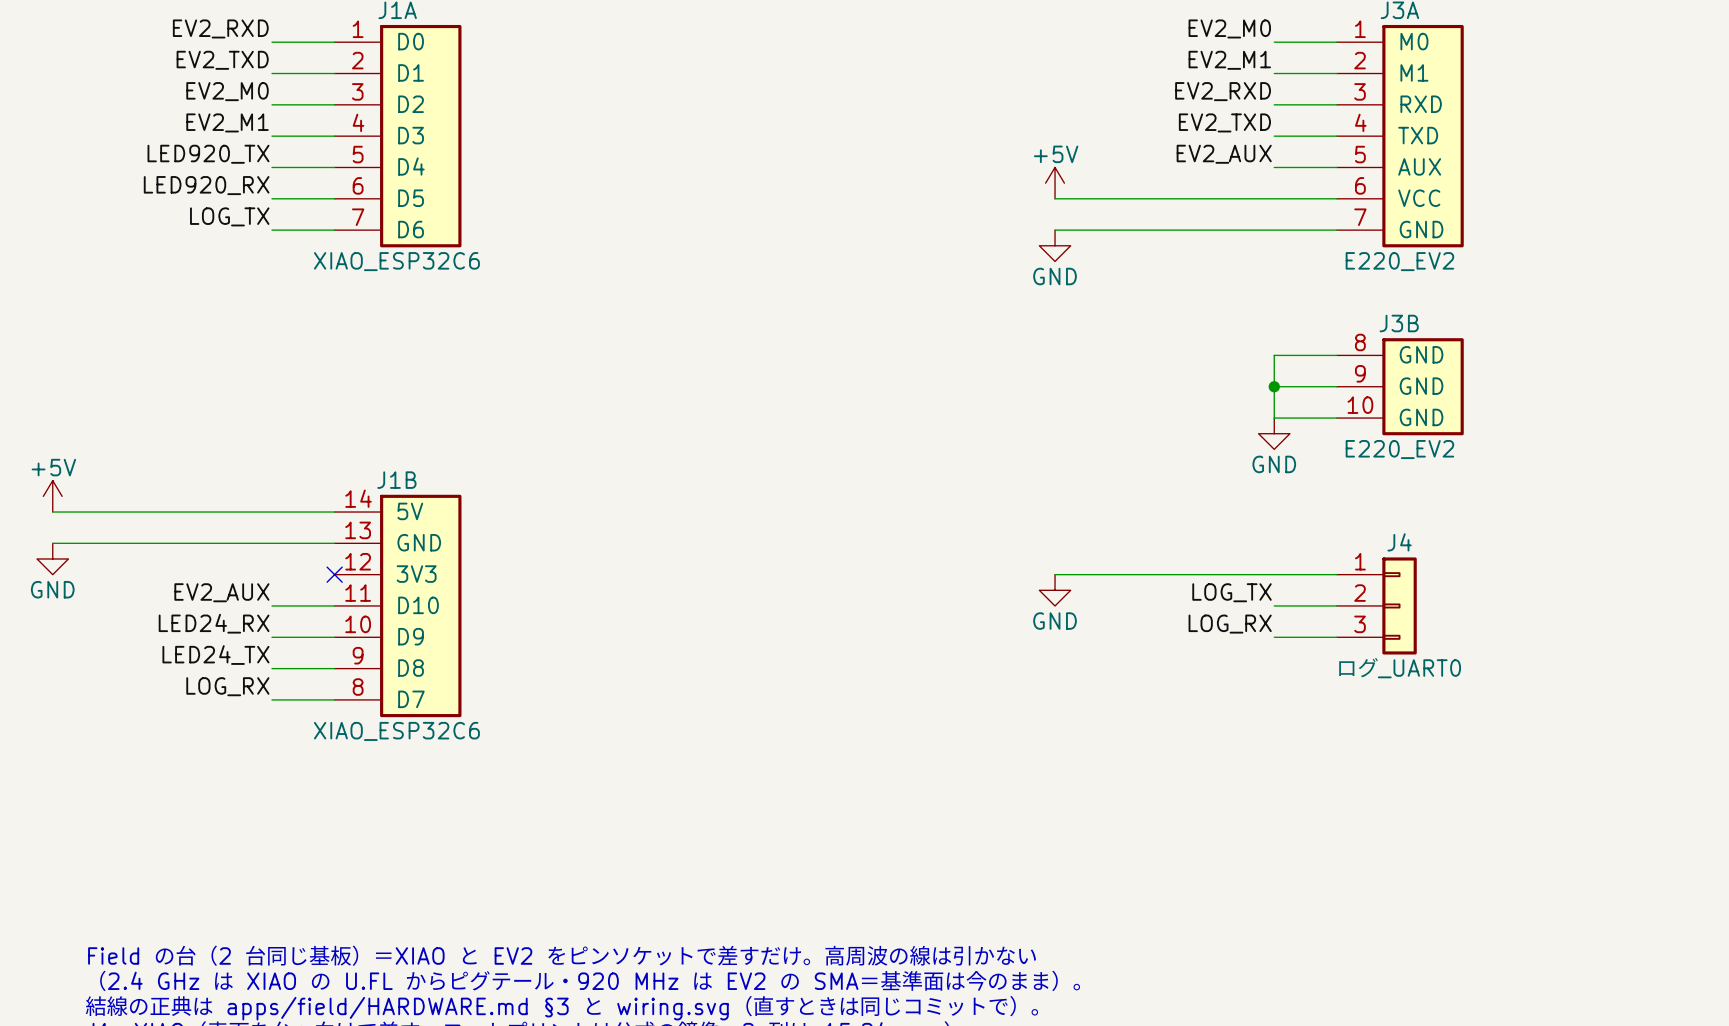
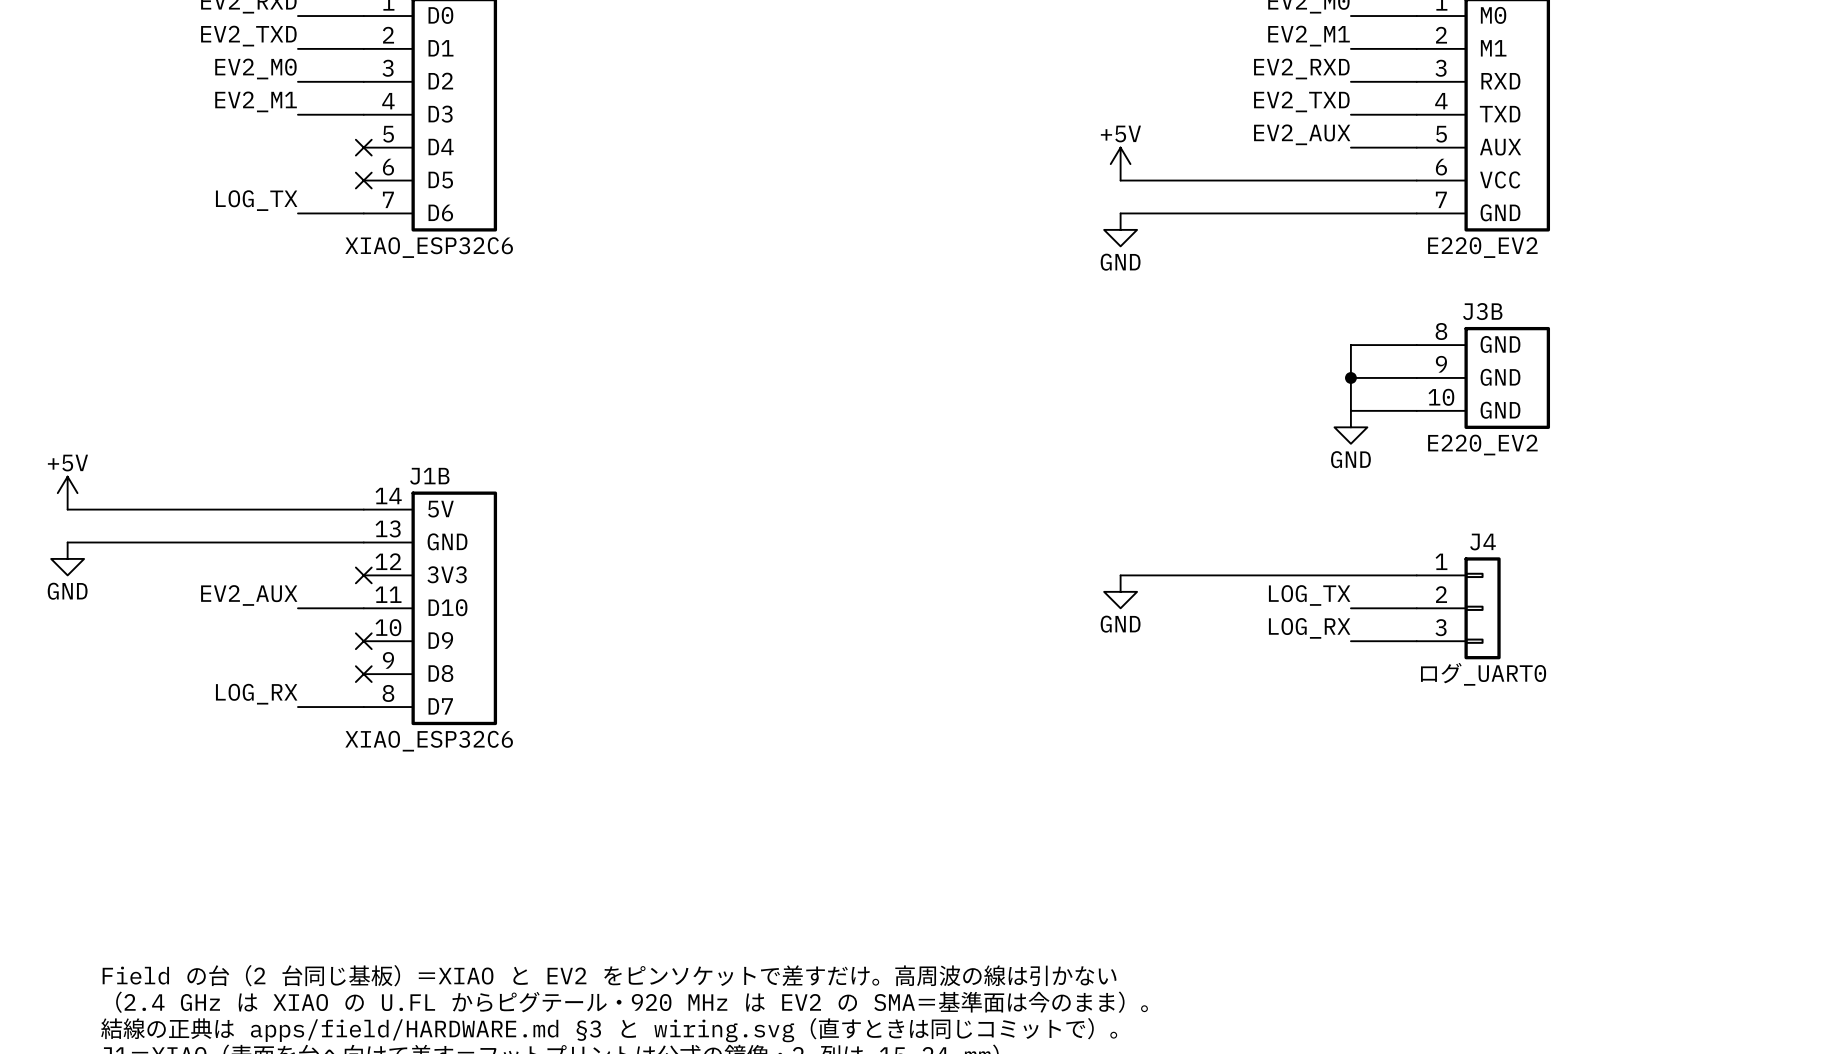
label: LED920_TX (208, 154) -> none
wire: (271, 167) (334, 167) -> none
no-connect mark: none -> (363, 147)
label: LED920_RX (206, 185) -> none
wire: (271, 198) (334, 198) -> none
no-connect mark: none -> (363, 180)
label: LED24_RX (214, 623) -> none
wire: (271, 637) (334, 637) -> none
no-connect mark: none -> (363, 641)
label: LED24_TX (215, 655) -> none
wire: (271, 668) (334, 668) -> none
no-connect mark: none -> (363, 674)

